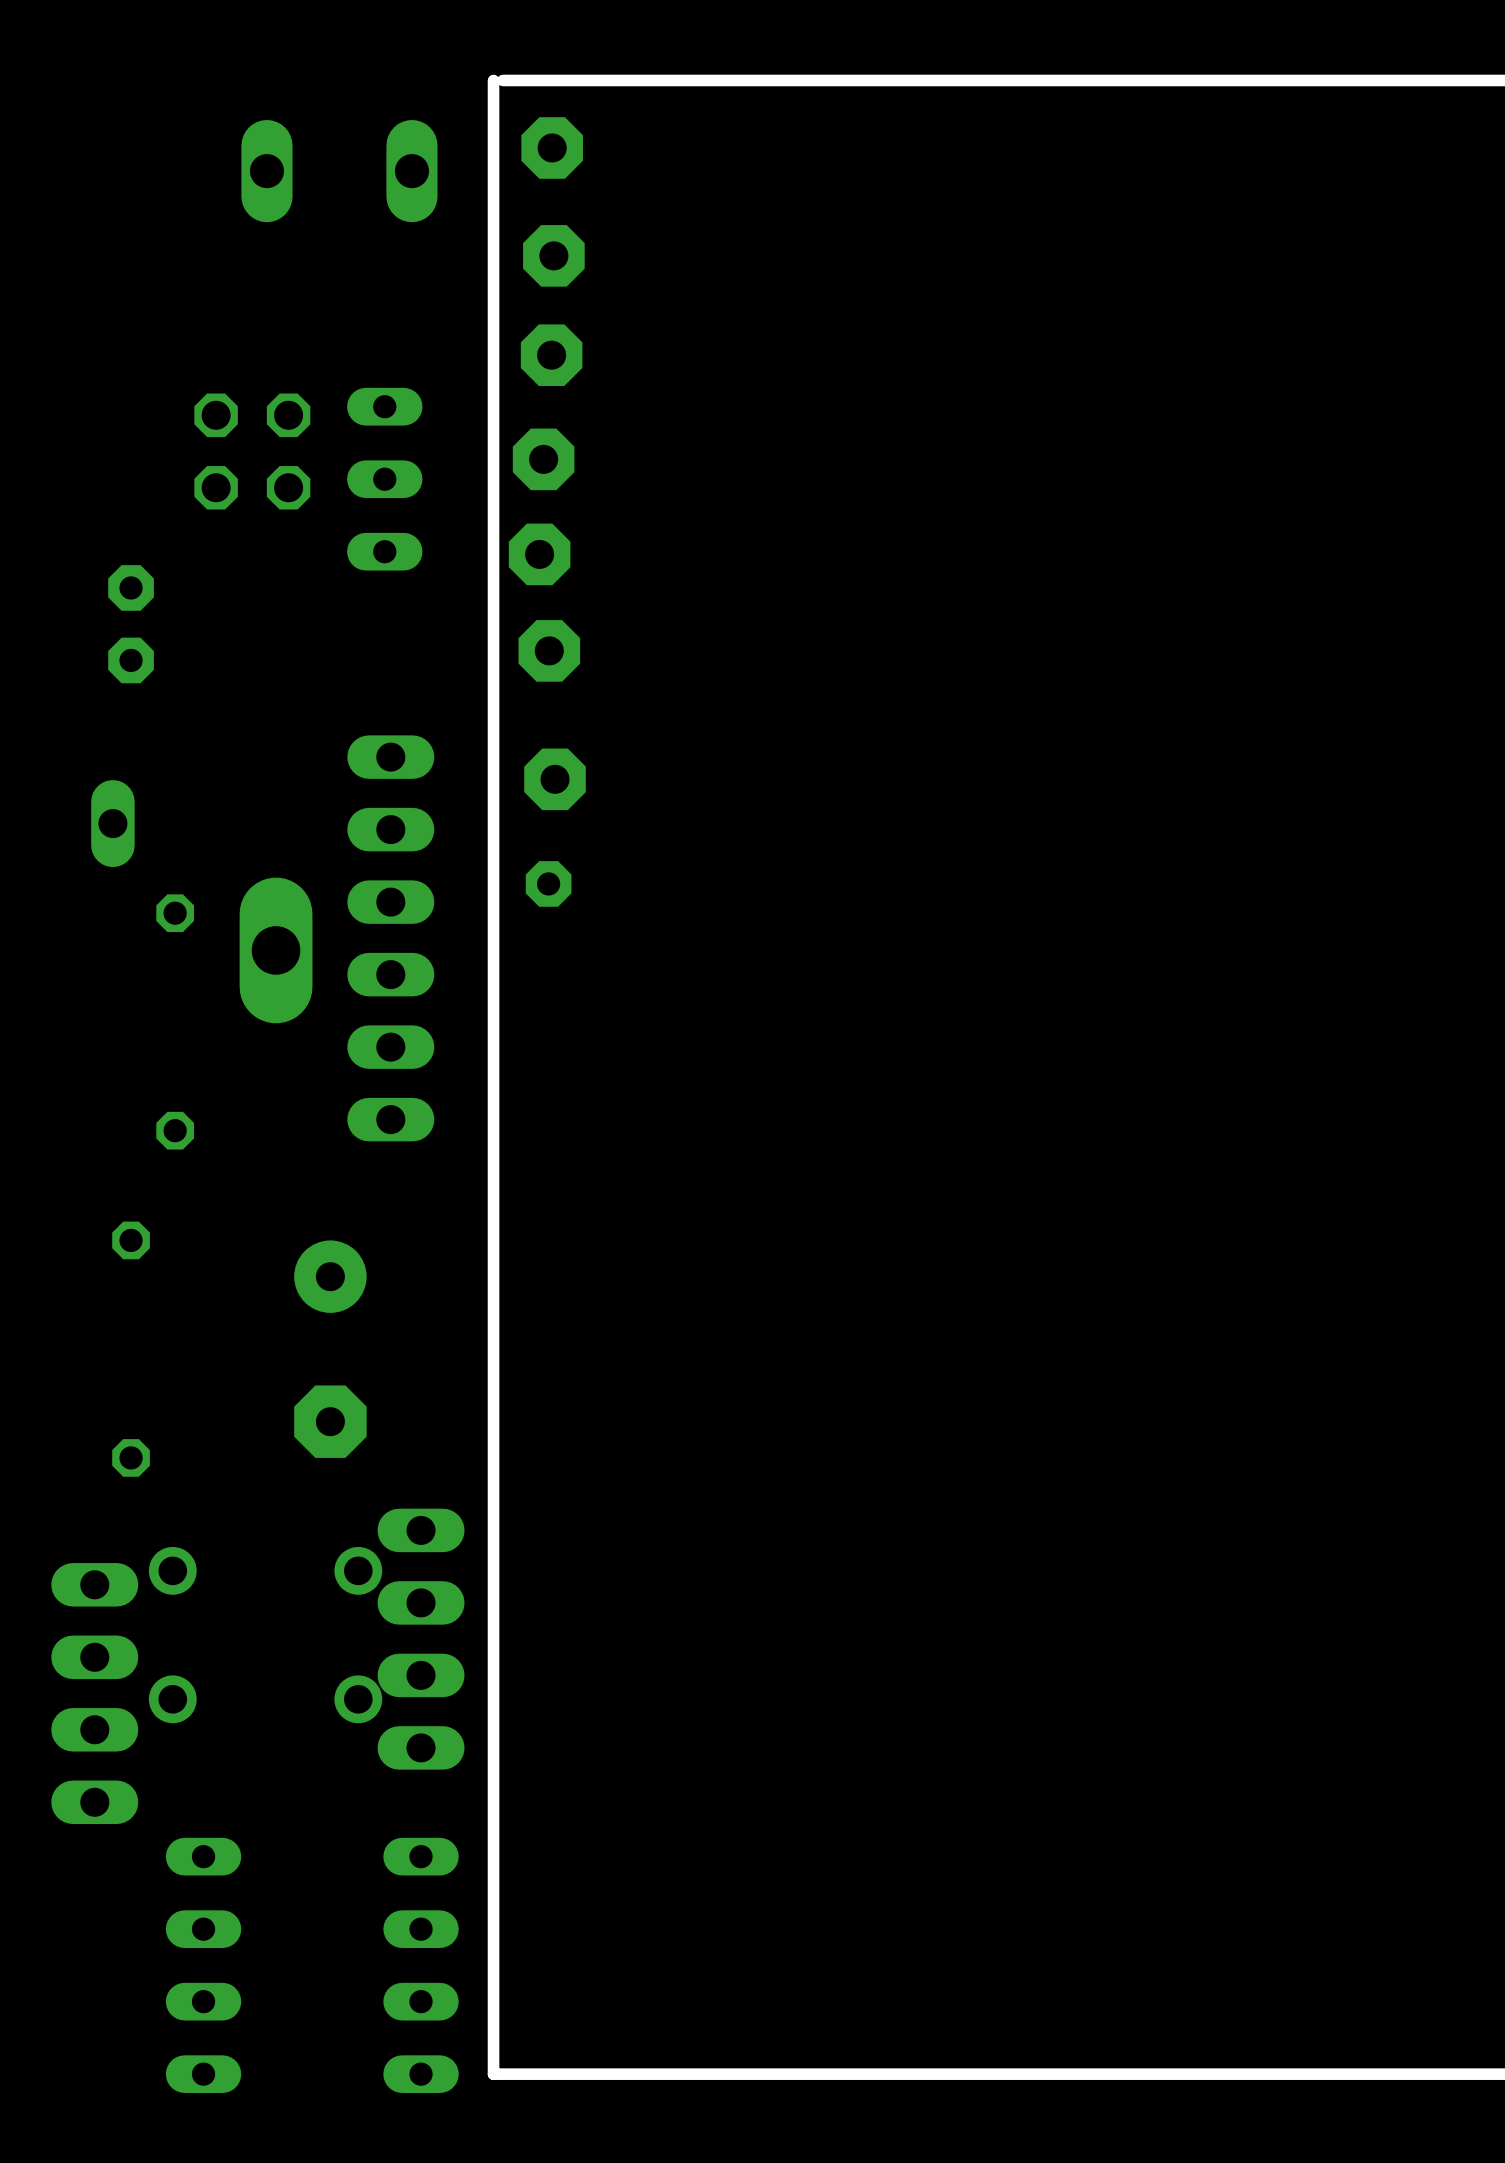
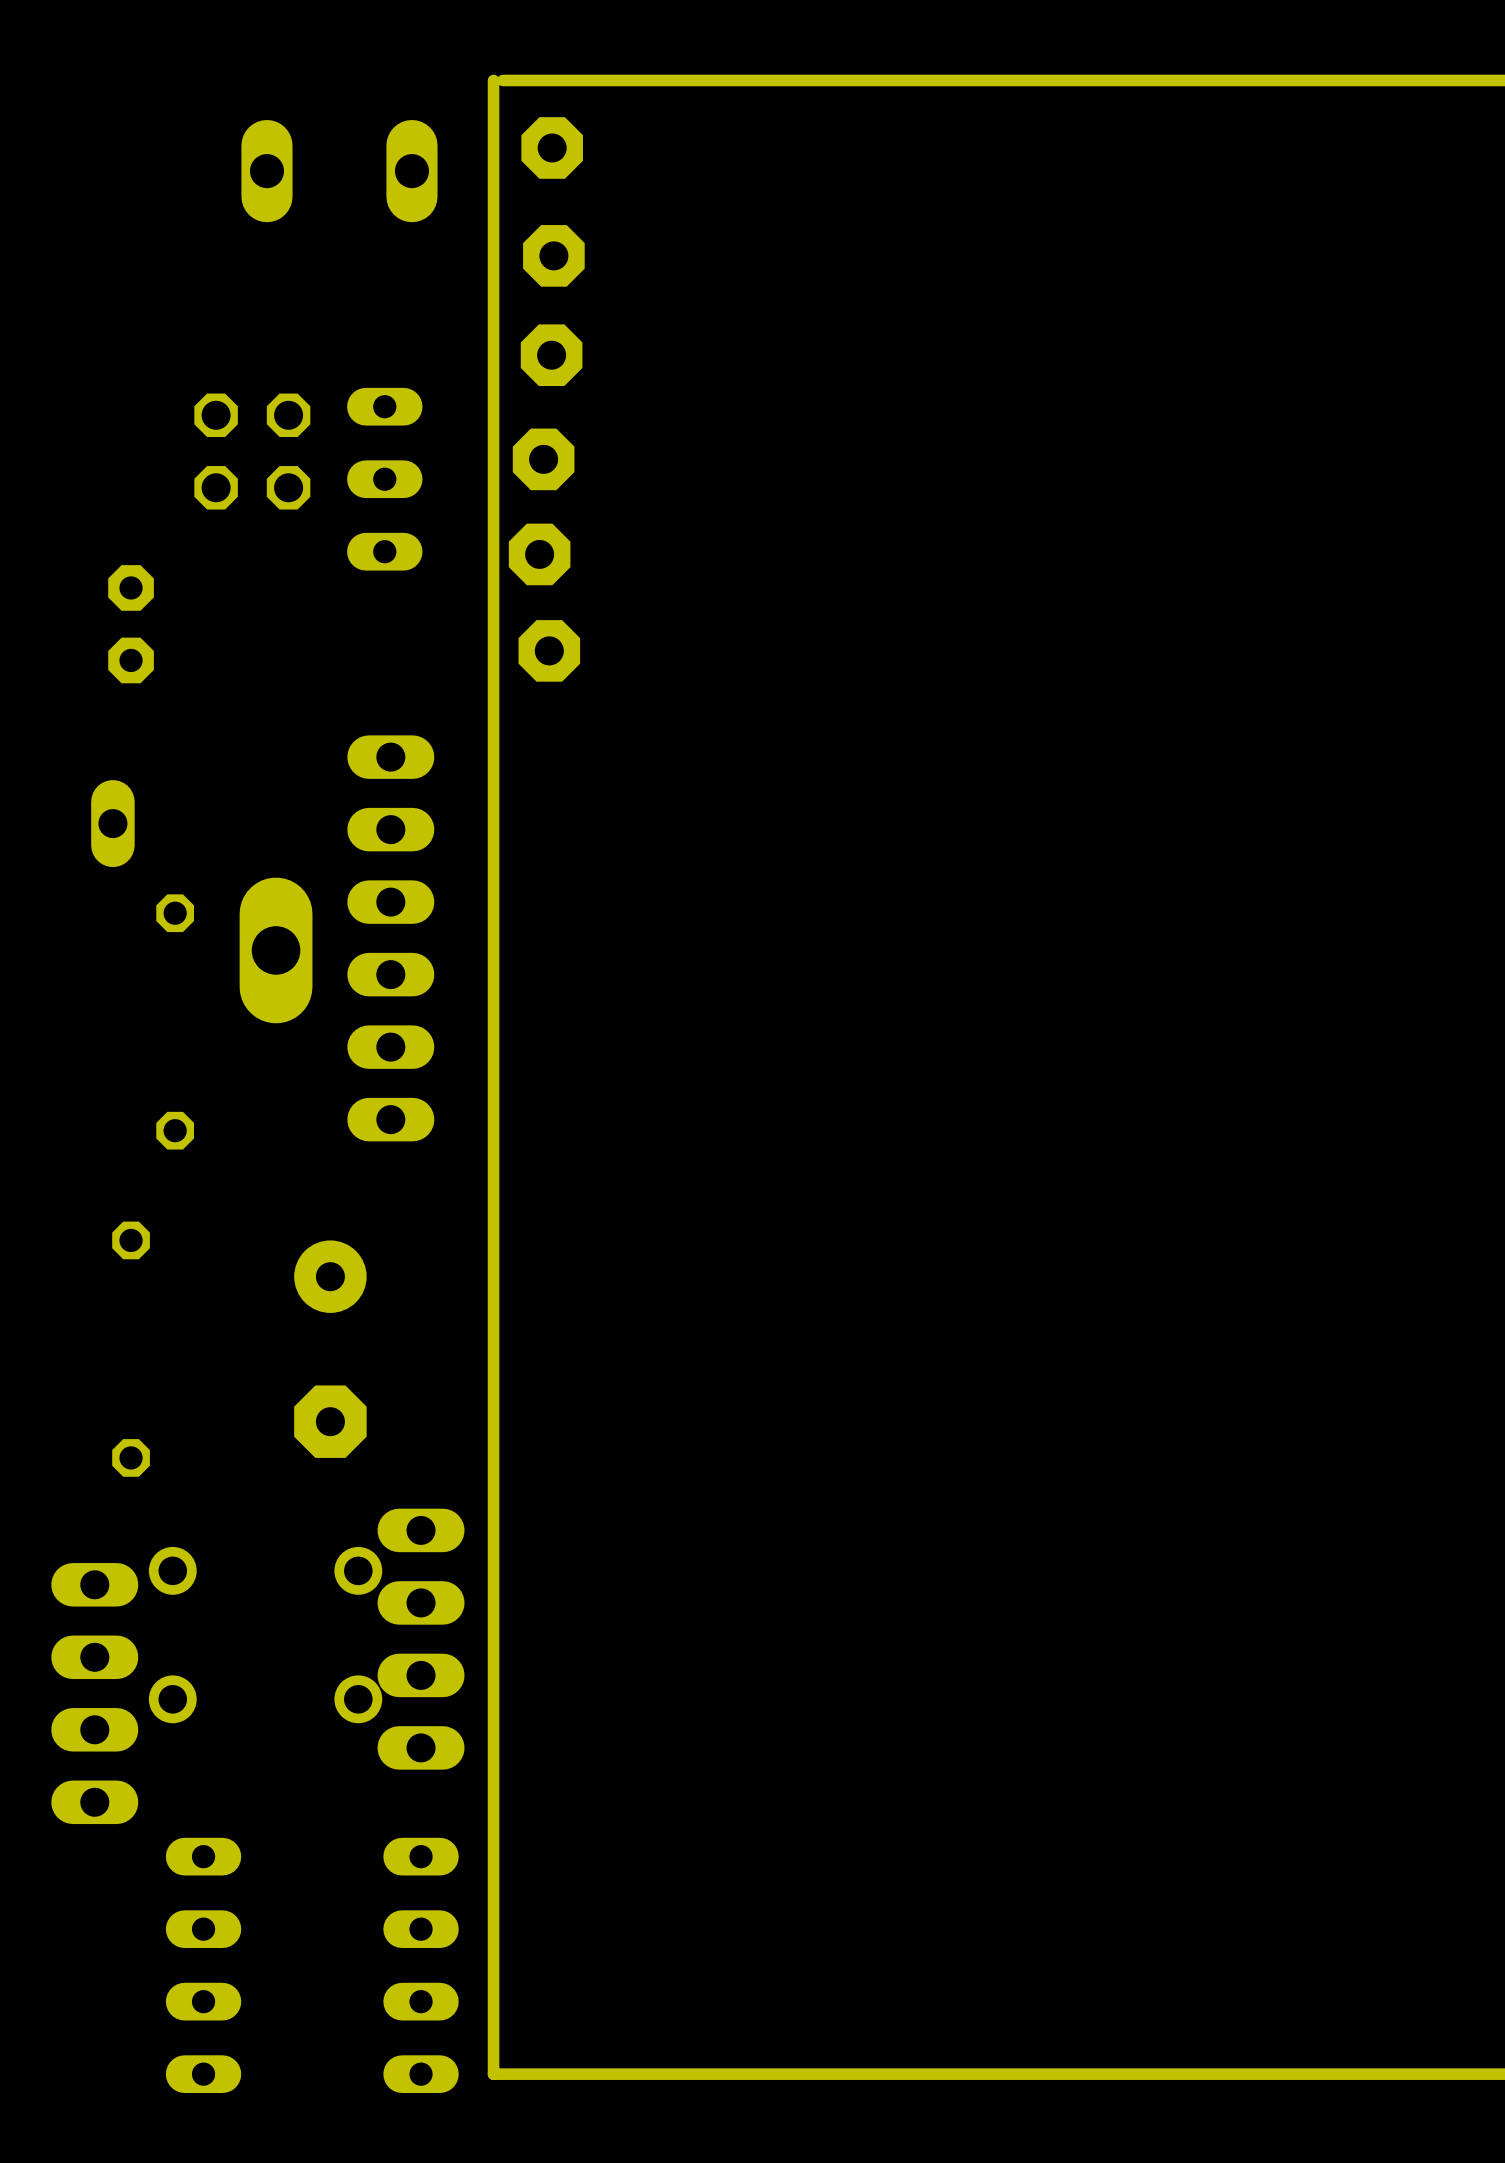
part: (555, 779) -> none
part: (548, 883) -> none

